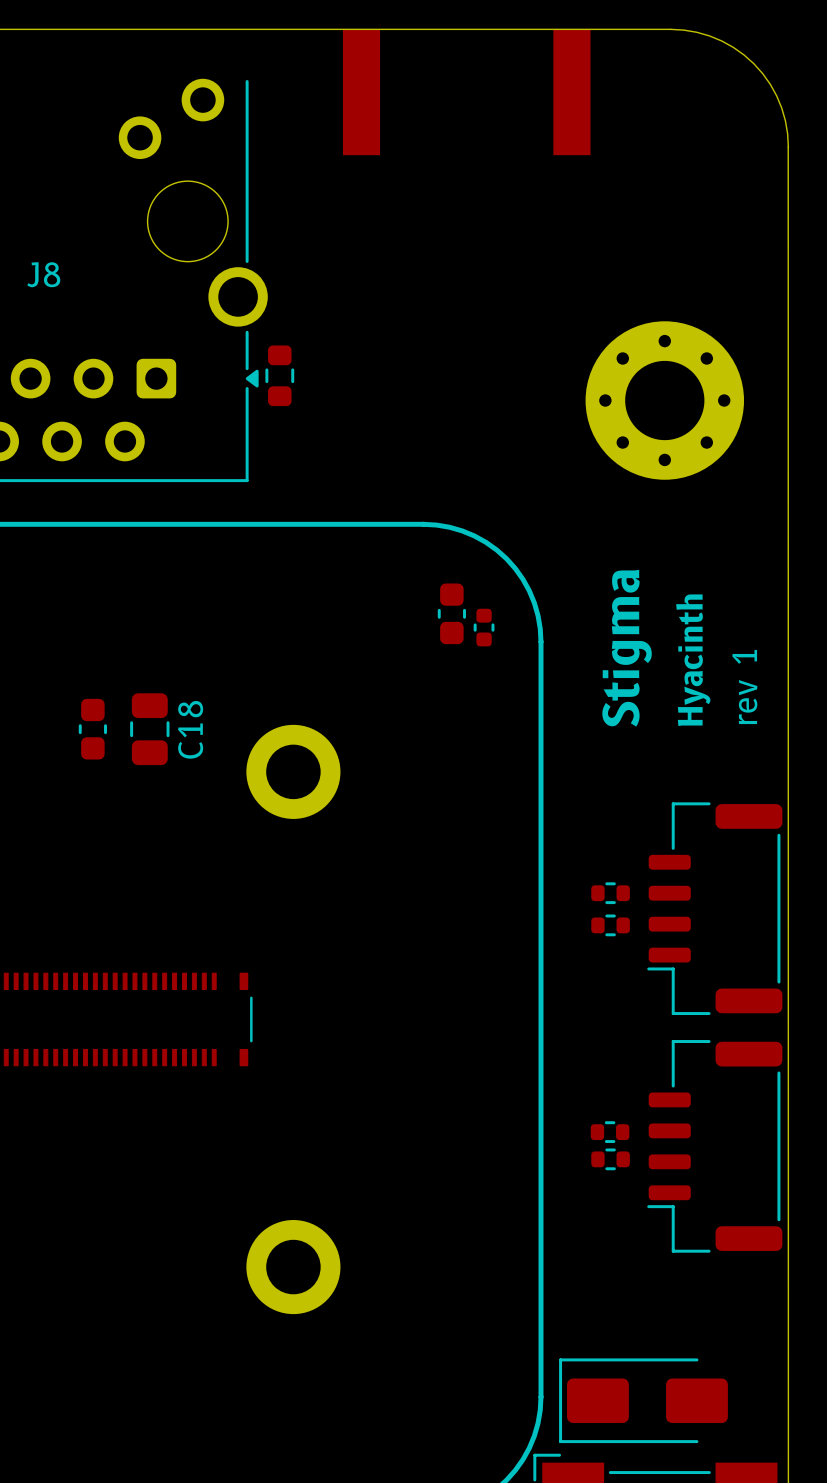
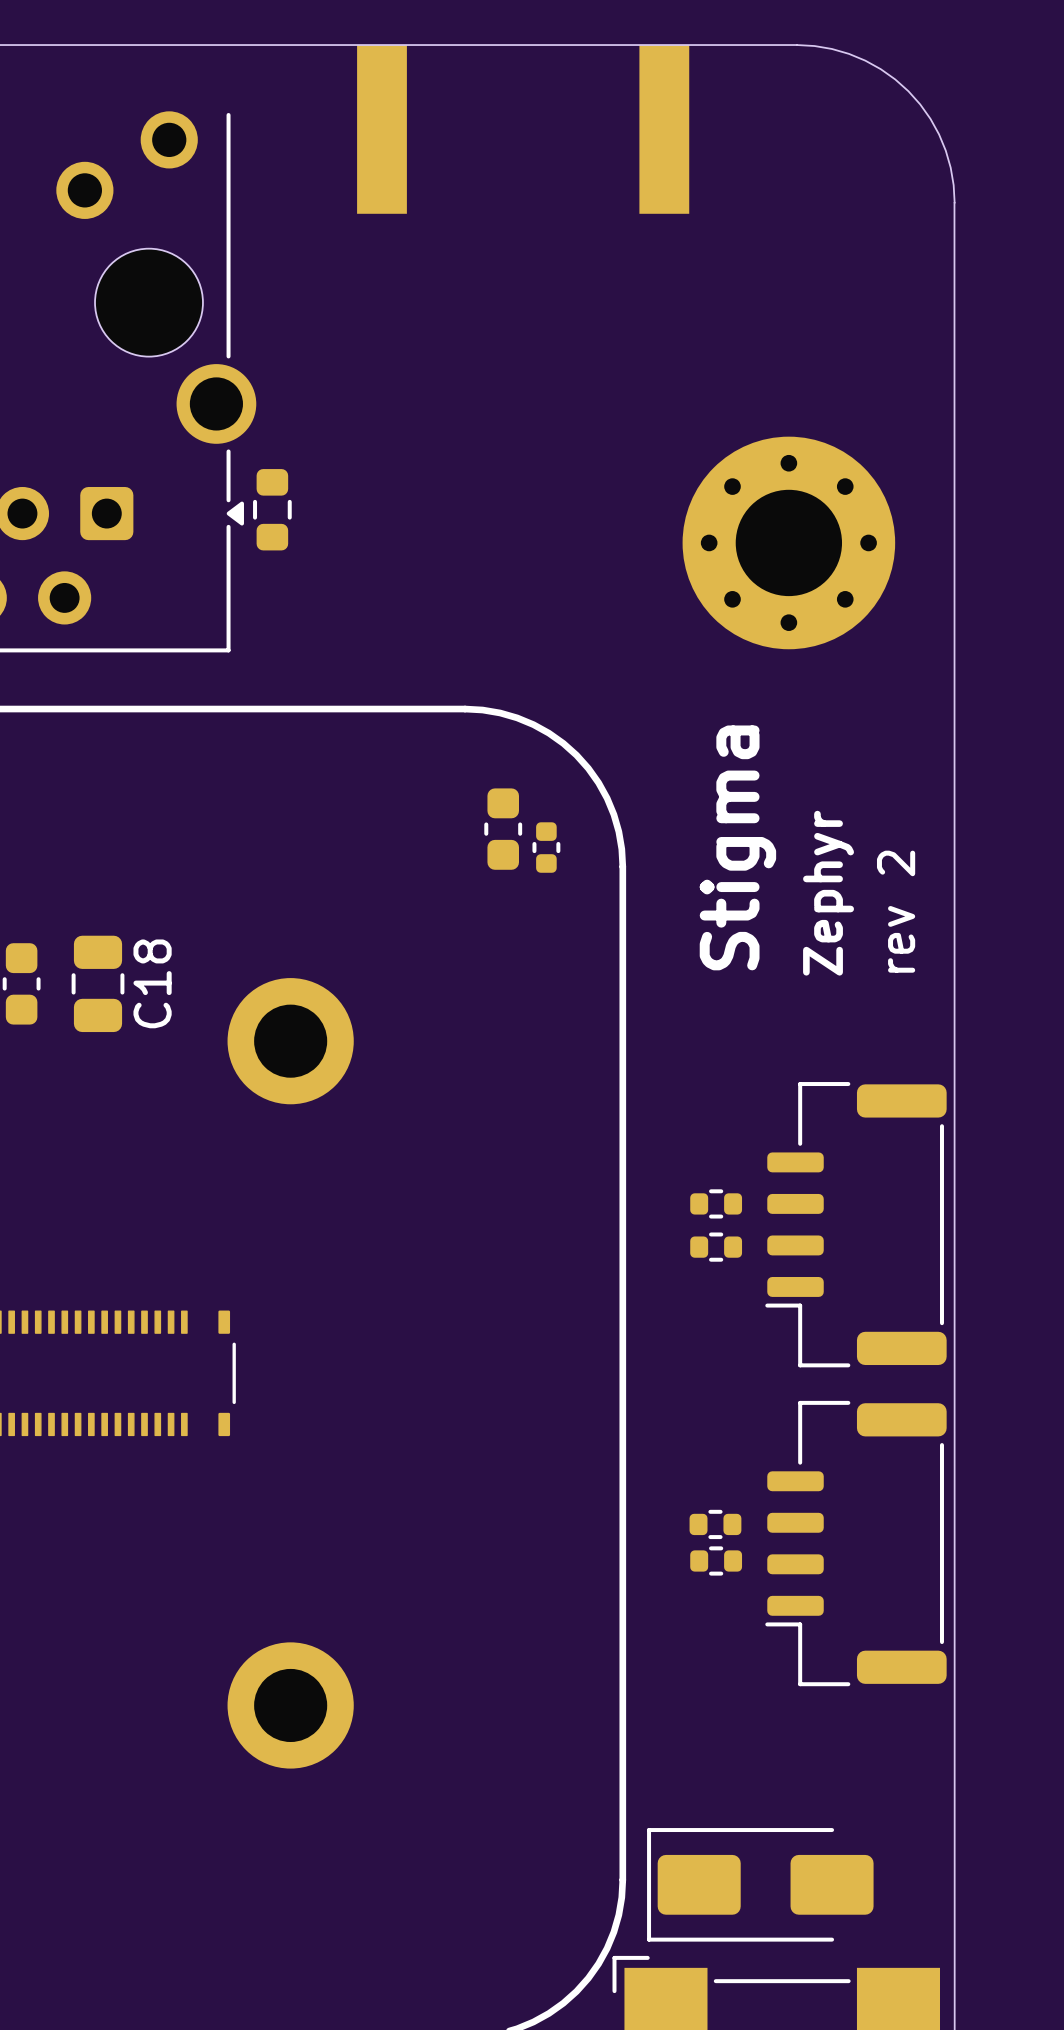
text: Hyacinth (693, 660) -> Zephyr (828, 893)
text: rev 1 (744, 687) -> rev 2 (896, 911)

